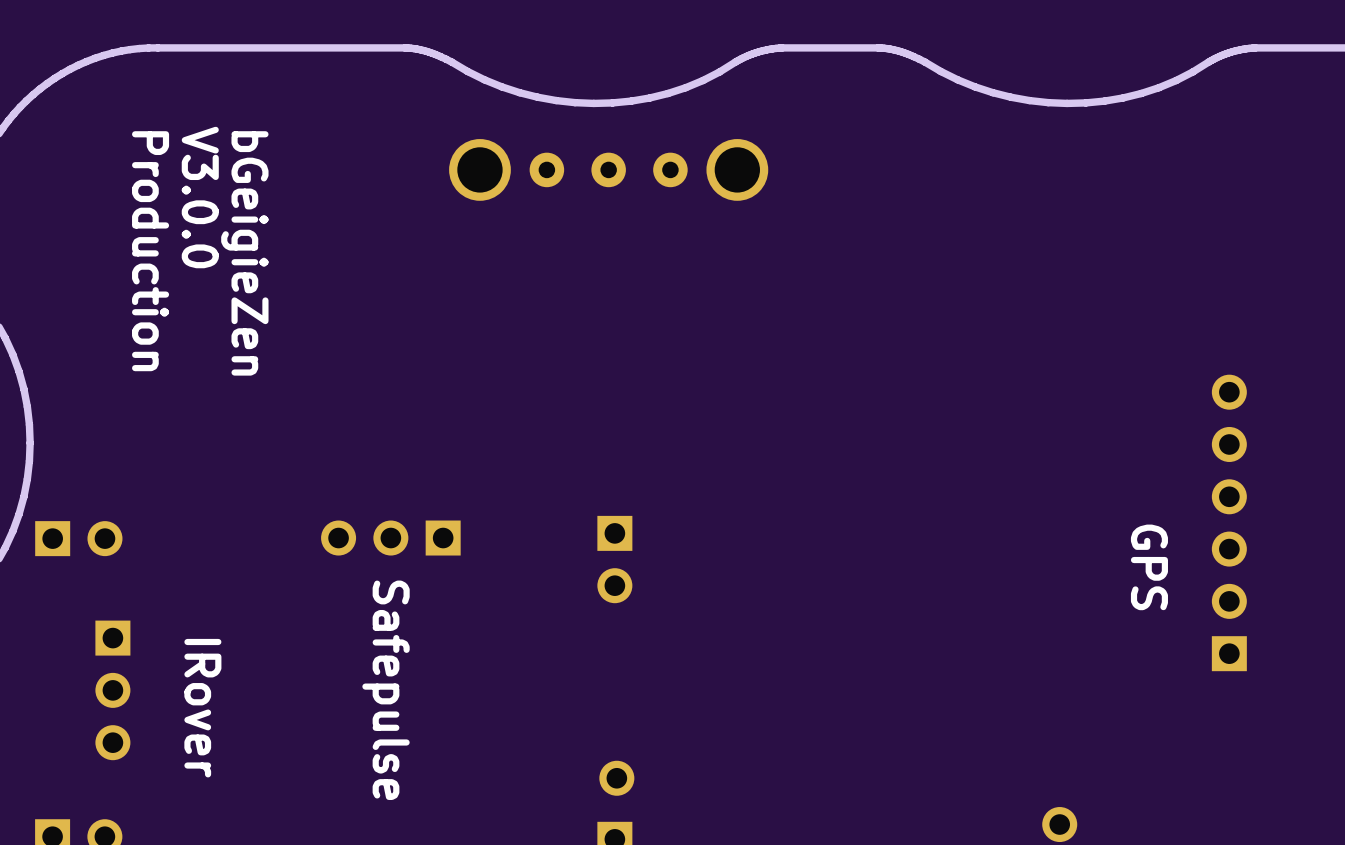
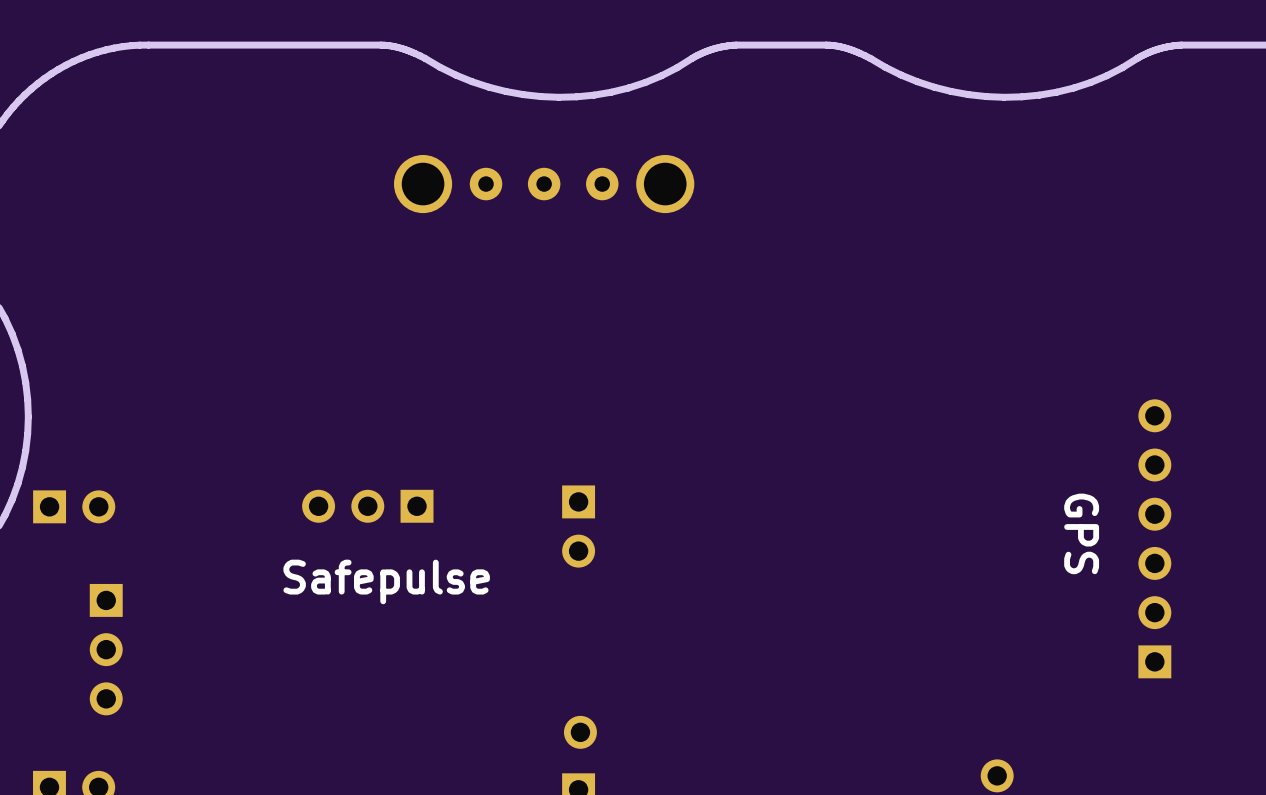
part position: (608, 169) -> (544, 184)
text: V3.0.0 (200, 197) -> none
text: Production (150, 251) -> none
text: bGeigieZen (244, 253) -> none
part position: (1229, 522) -> (1154, 538)
text rotation: 0° (386, 690) -> 90° counterclockwise (386, 581)
text: IRover (202, 708) -> none

